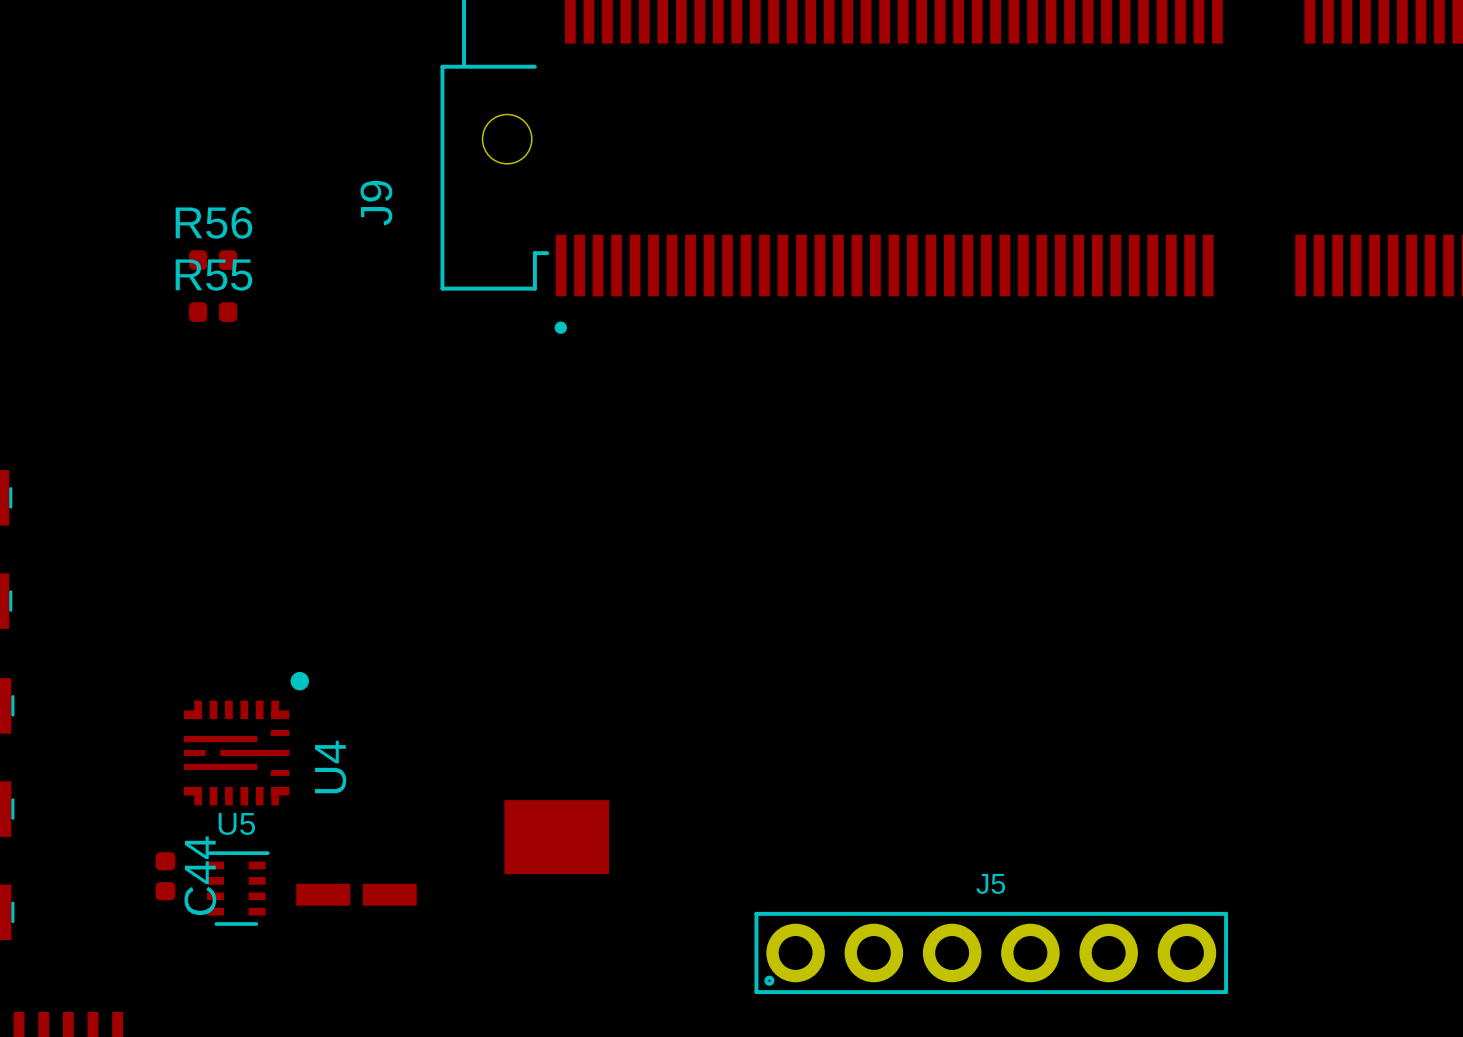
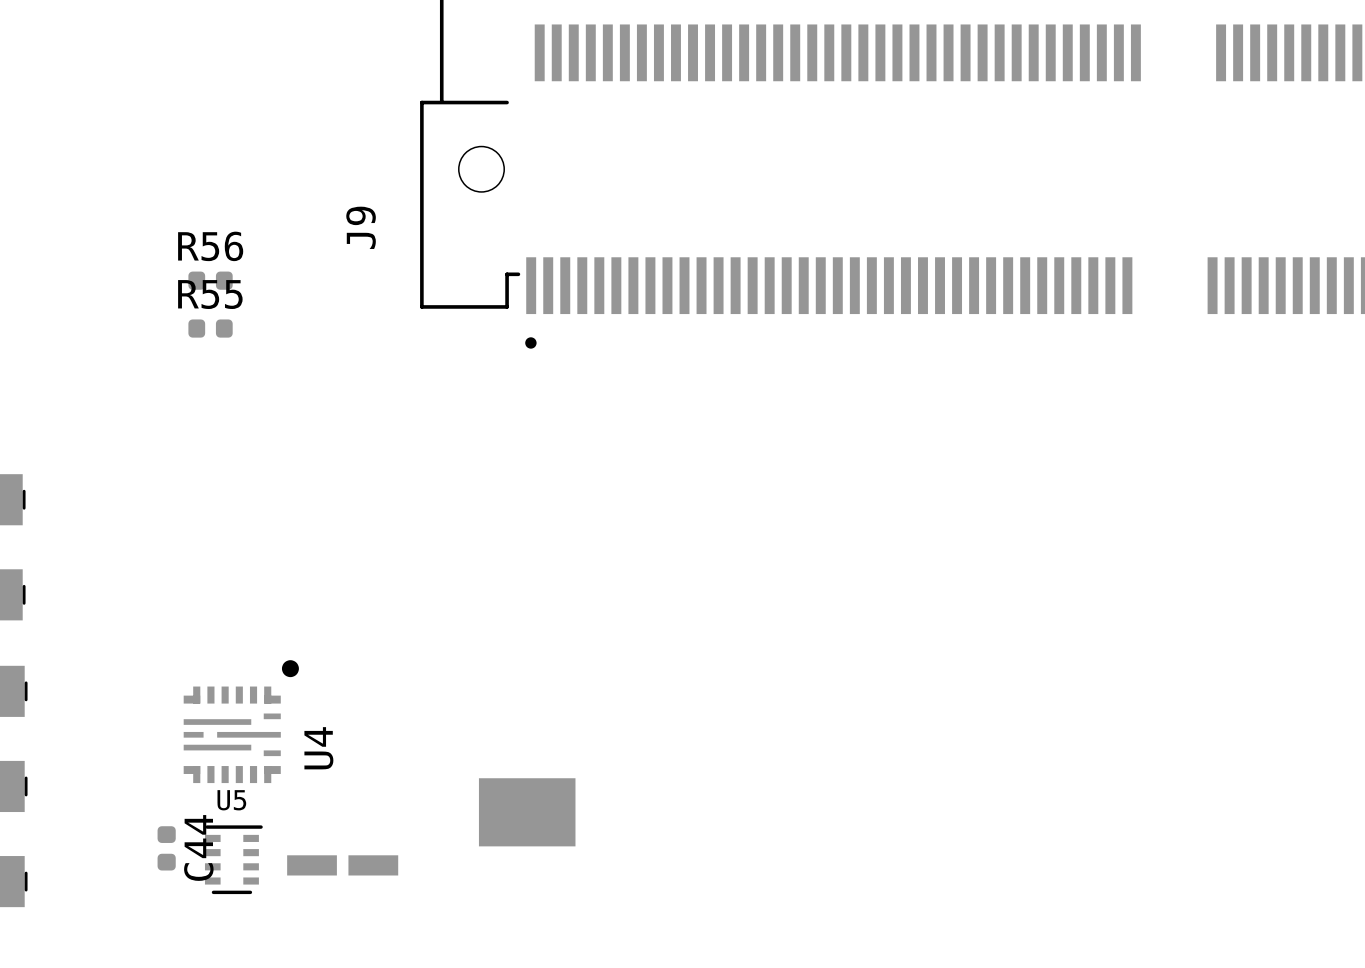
J5: (991, 952) -> none

